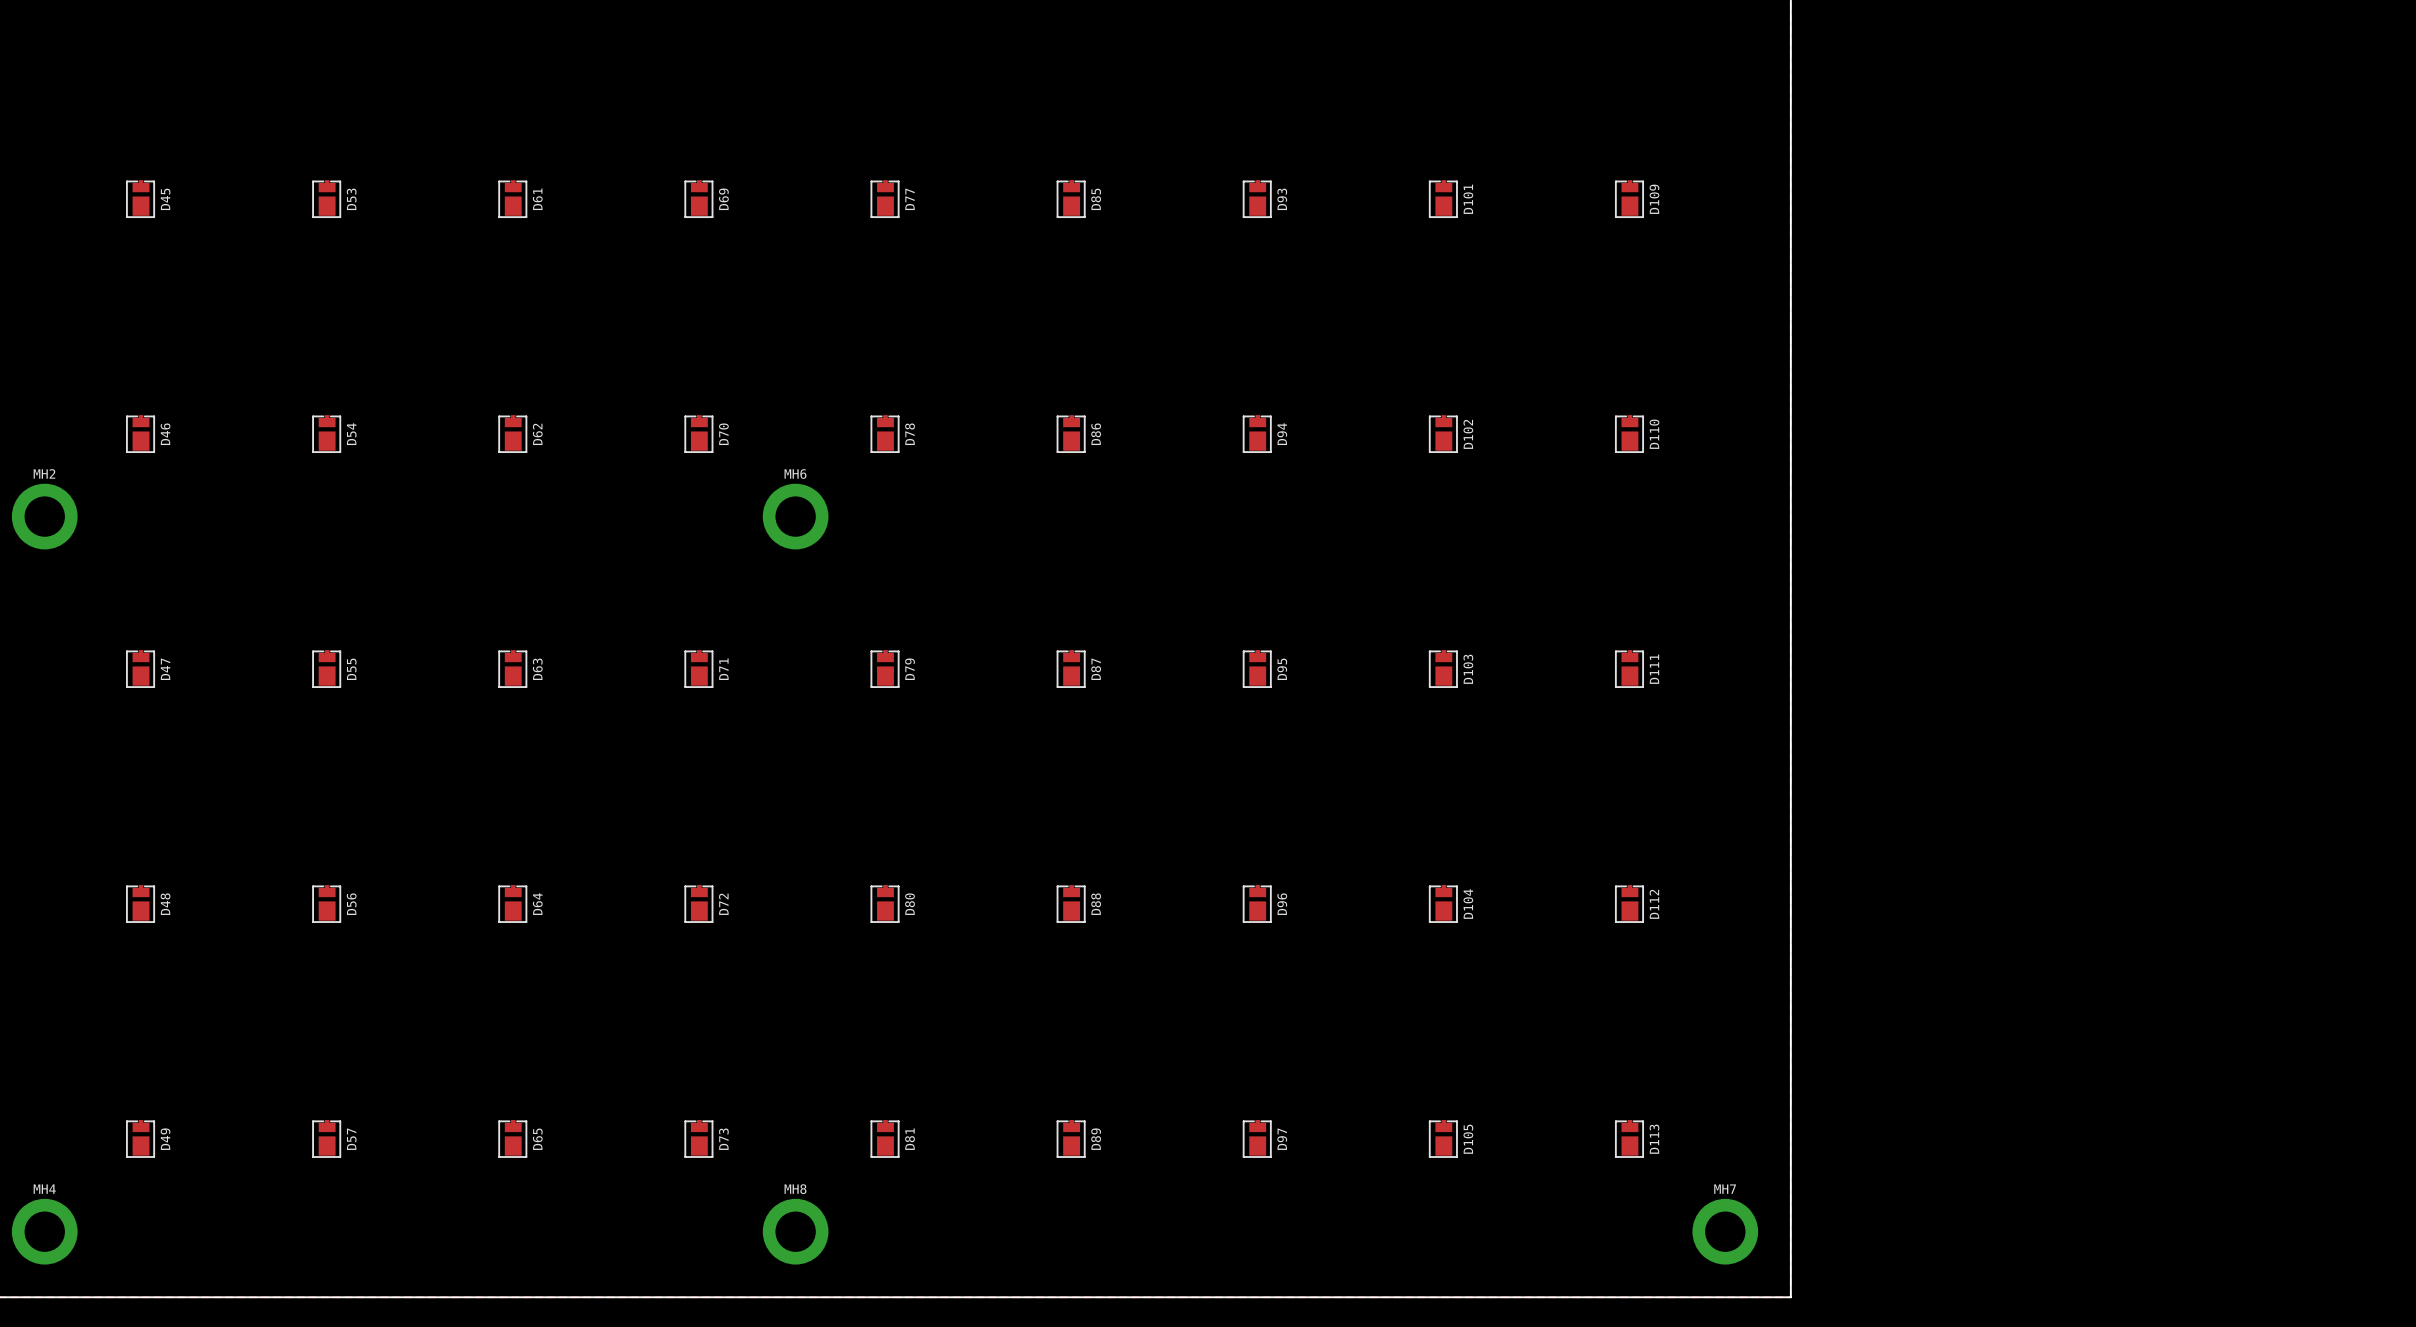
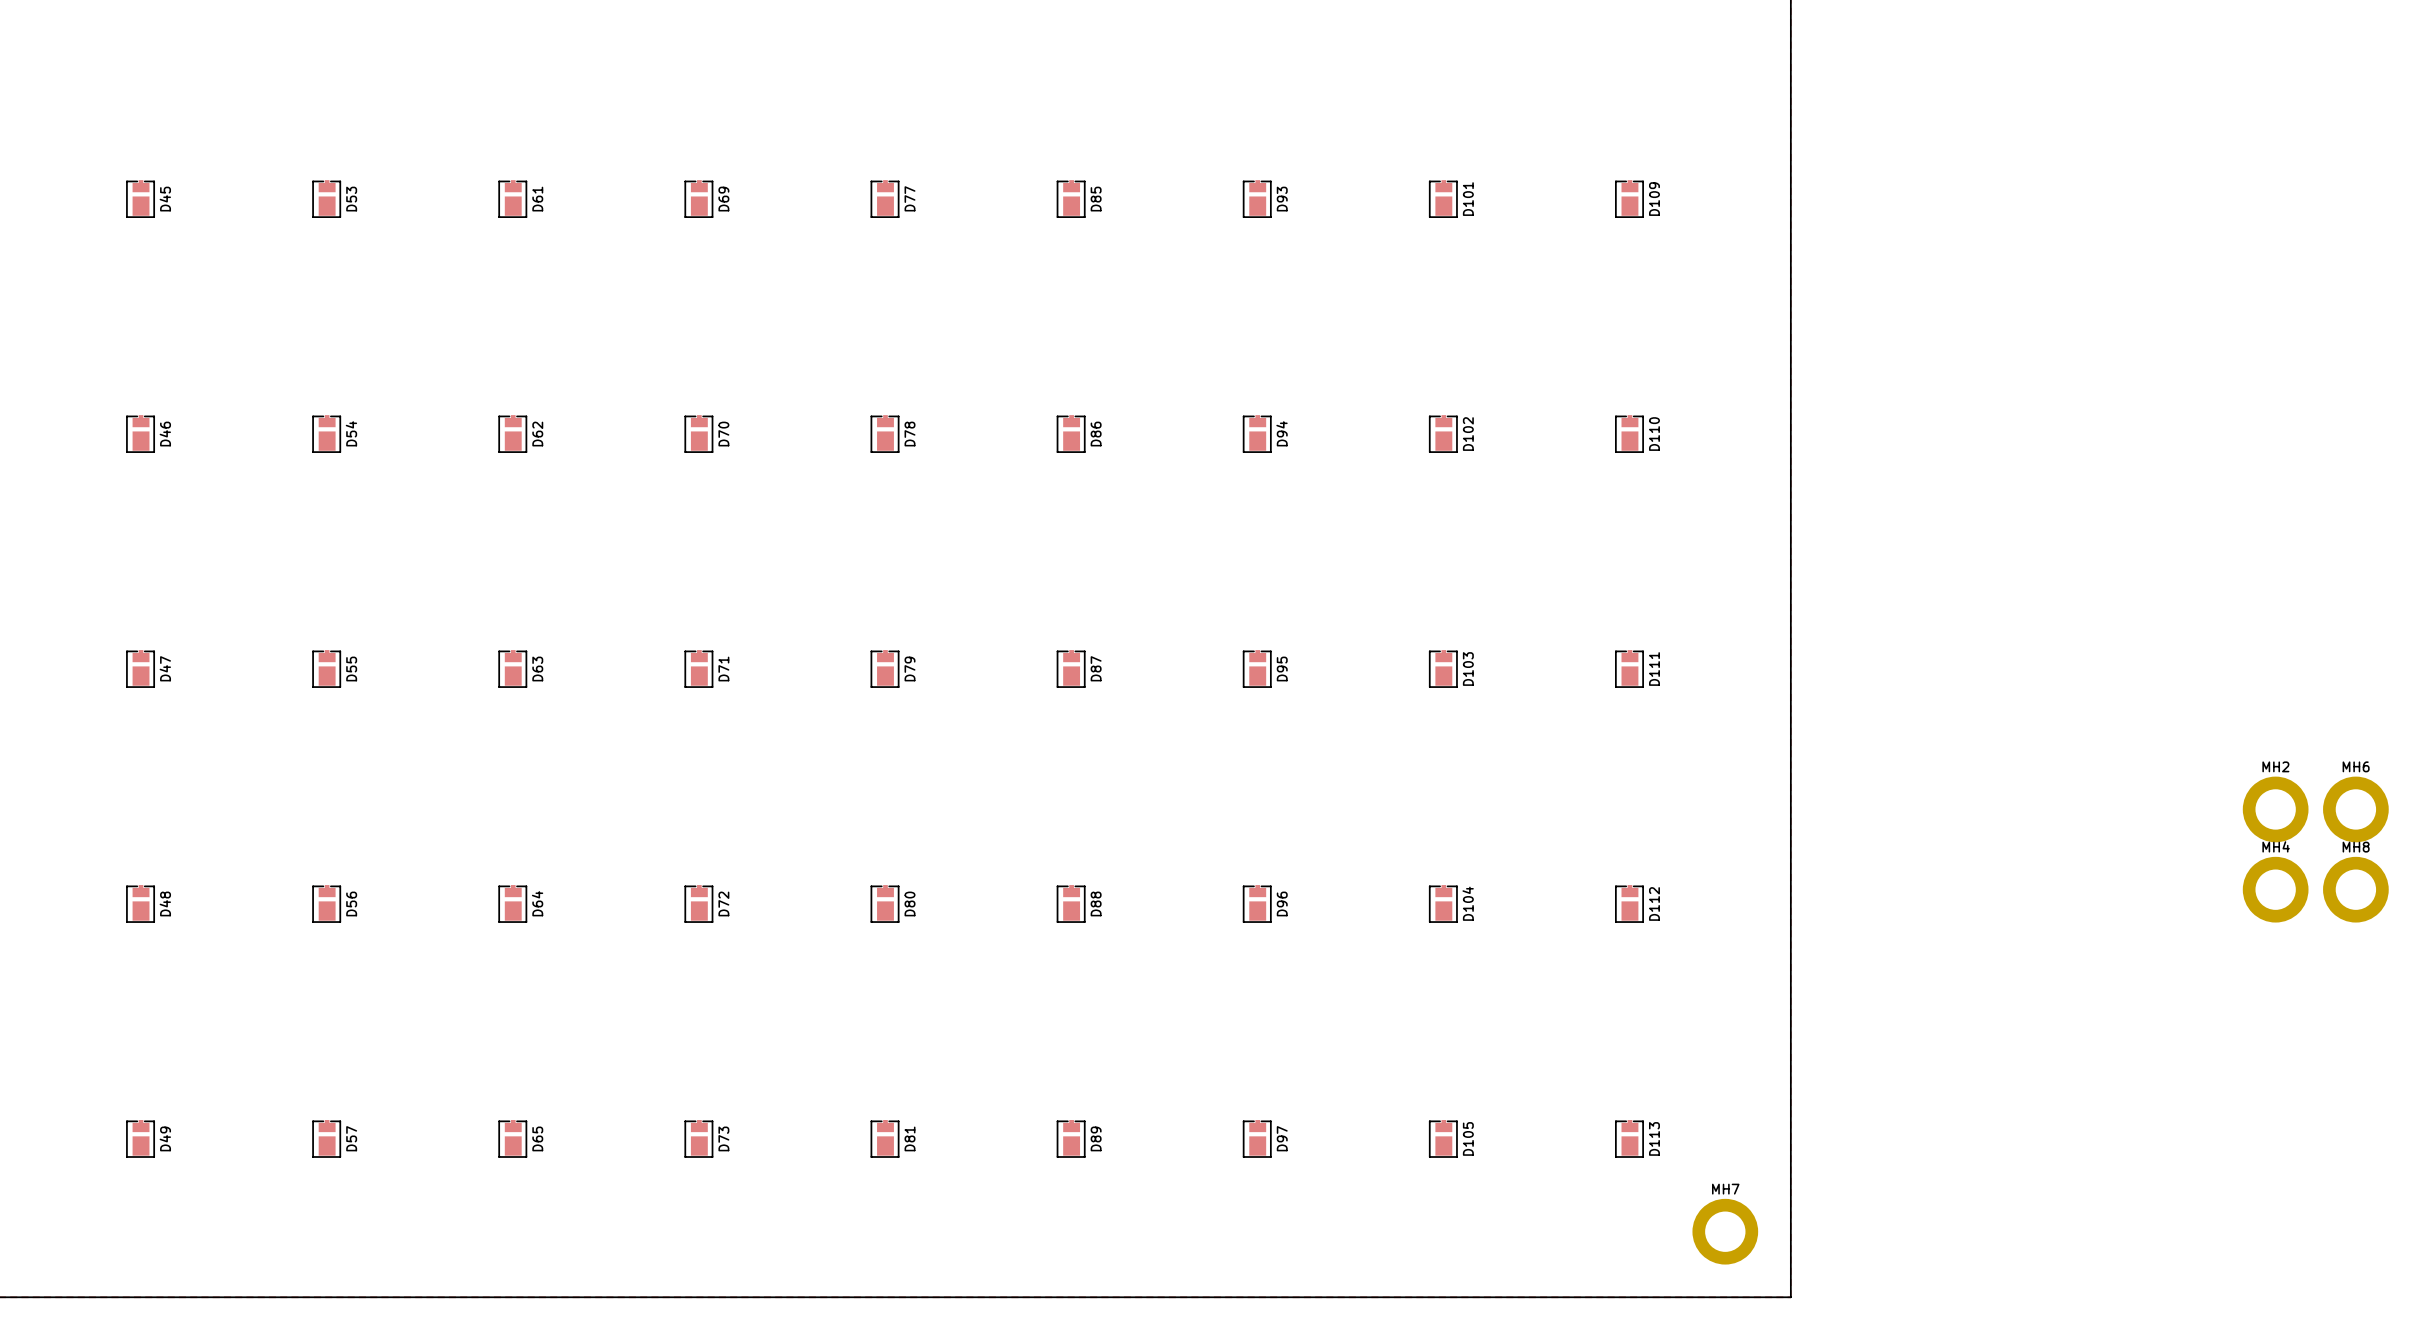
MH2 position: (44, 516) -> (2275, 809)
MH6 position: (795, 516) -> (2355, 809)
MH4 position: (44, 1231) -> (2275, 889)
MH8 position: (795, 1231) -> (2355, 889)

